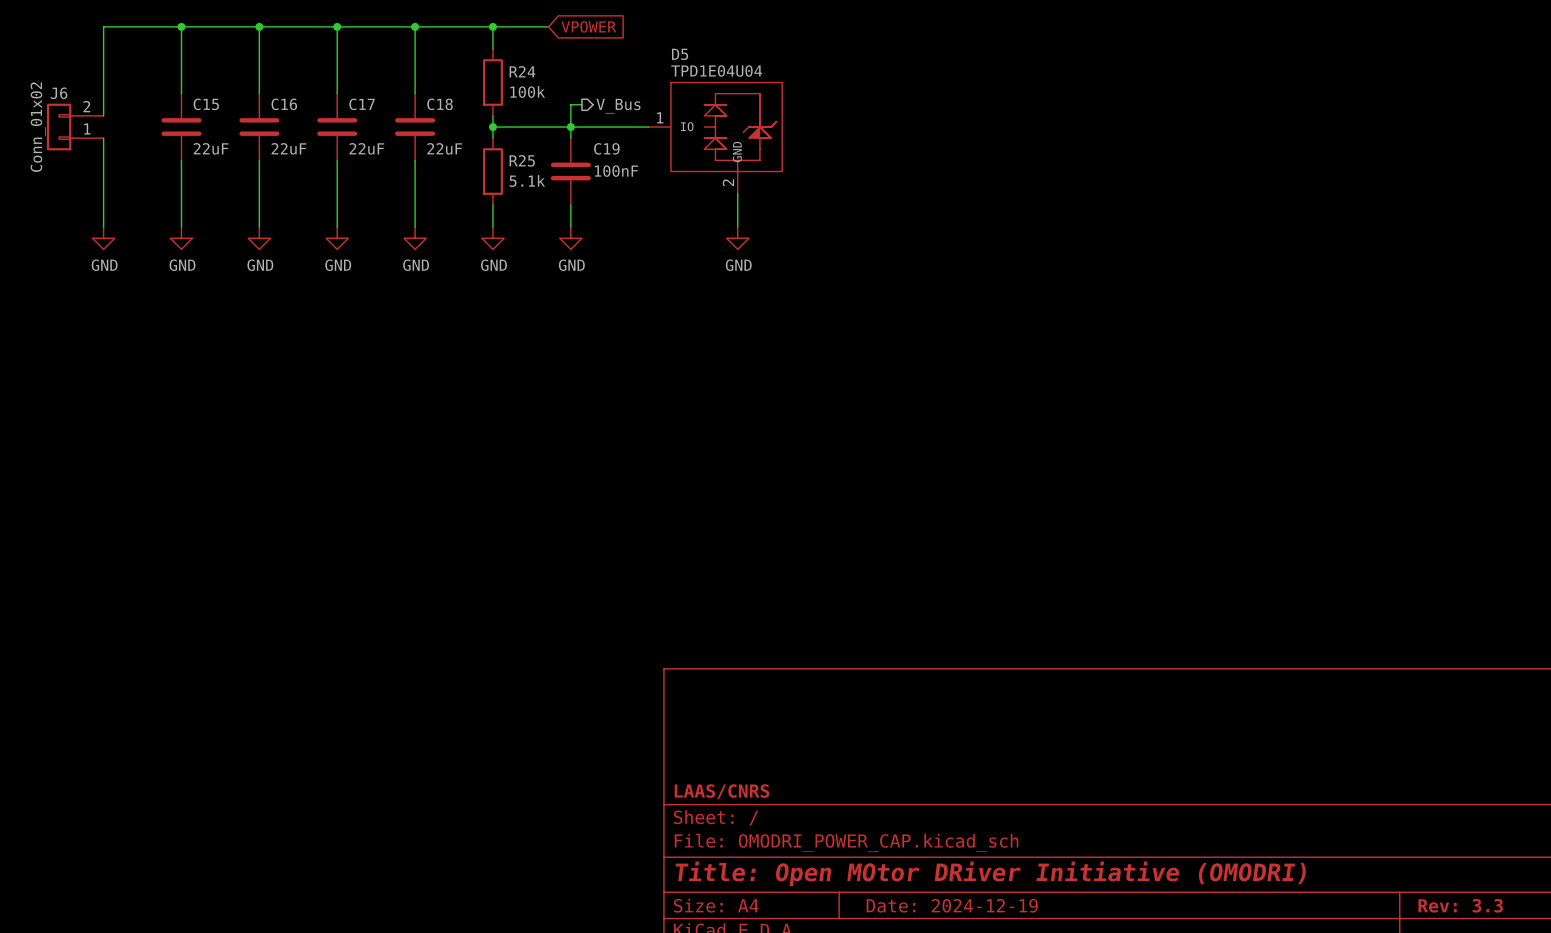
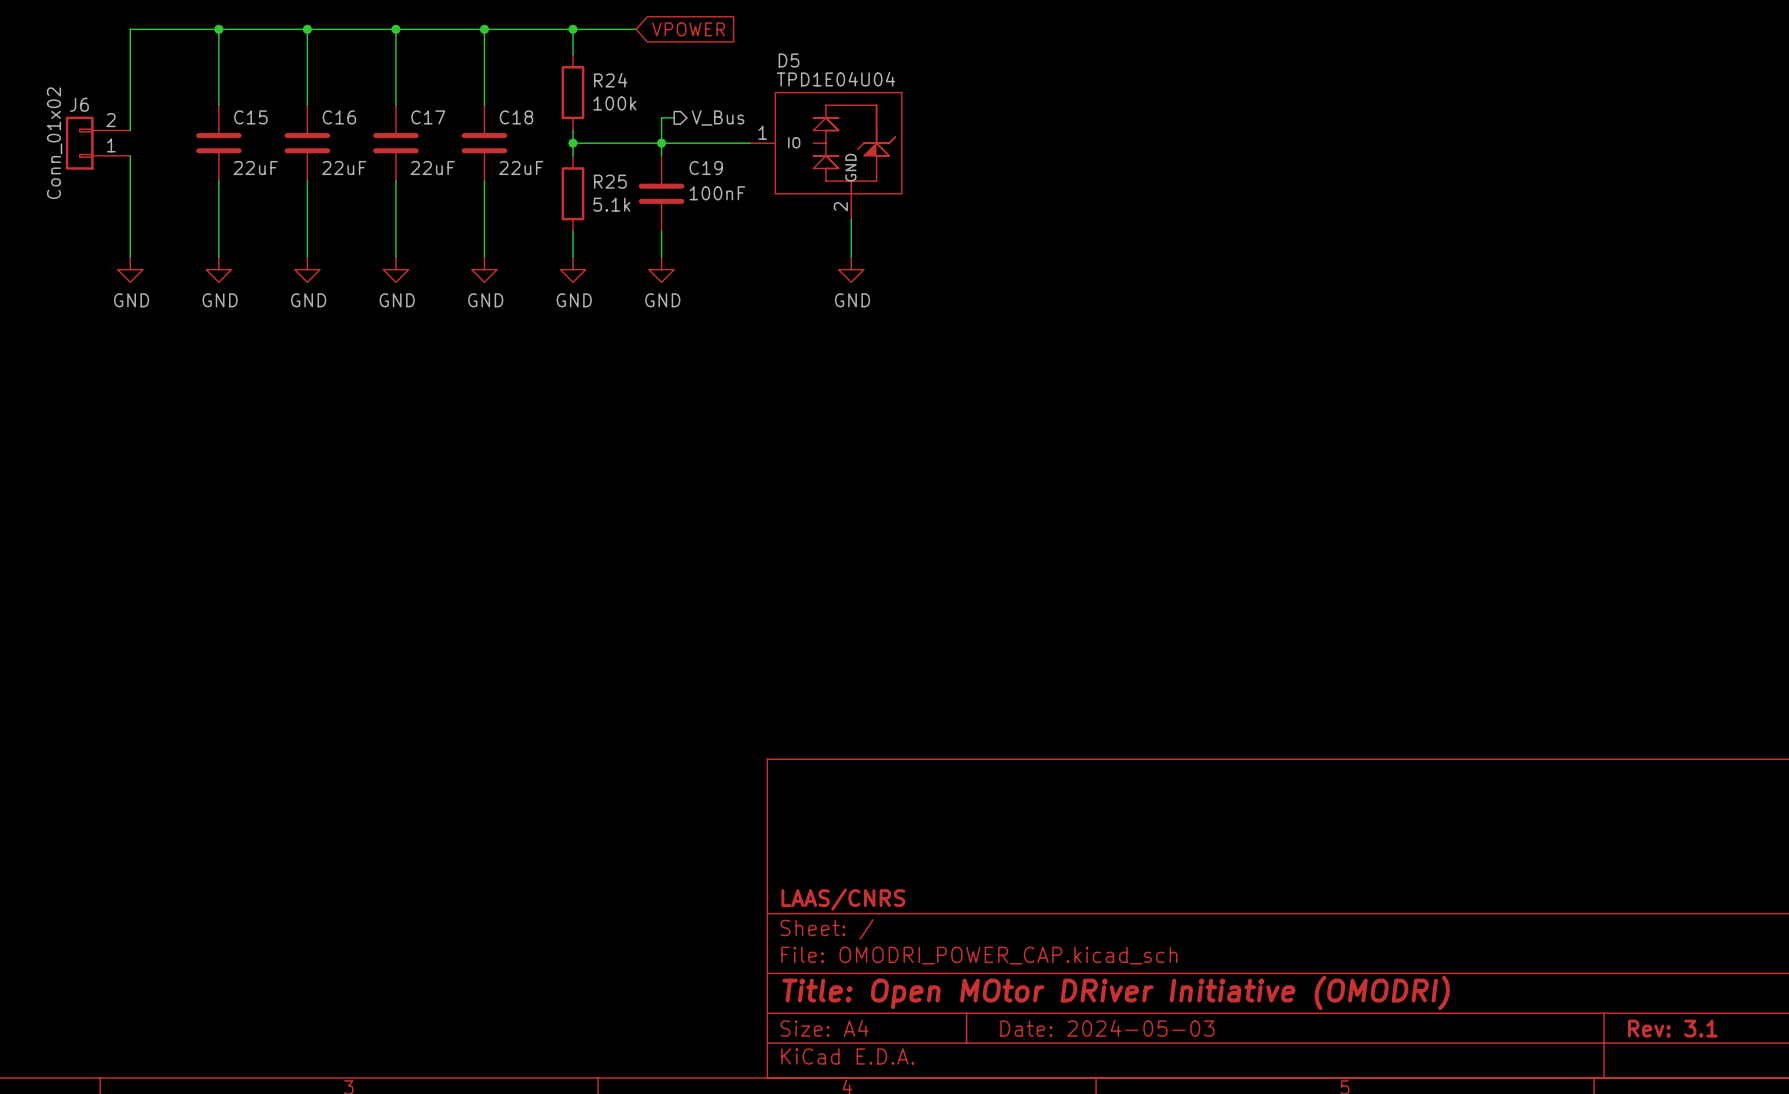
title block: Date: 2024-12-19 (952, 905) -> Date: 2024-05-03 (1107, 1028)
title block: Rev: 3.3 (1460, 905) -> Rev: 3.1 (1672, 1028)

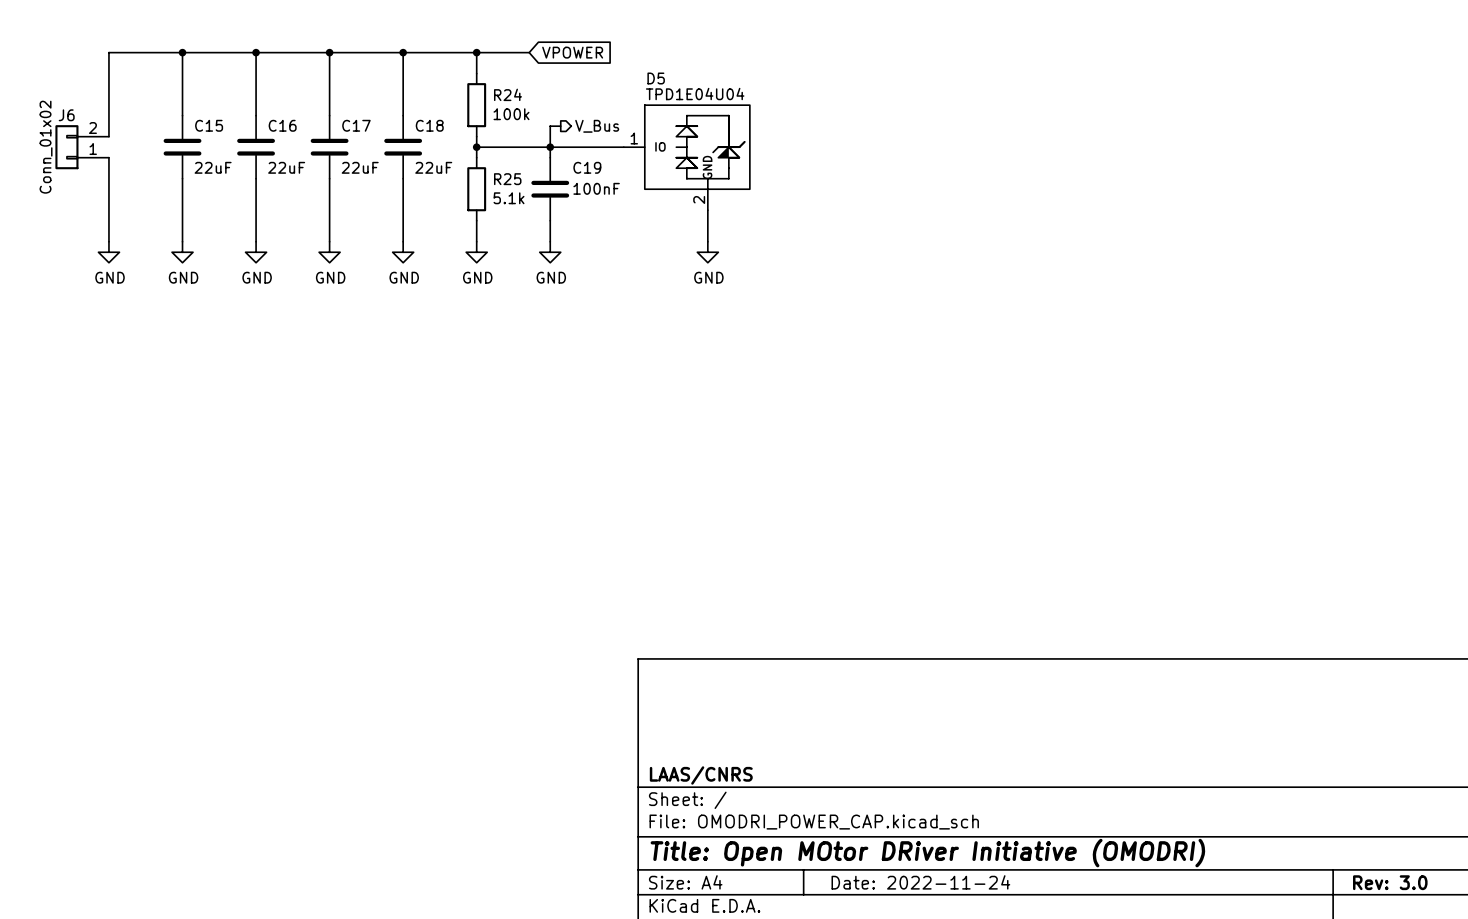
title block: Date: 2024-05-03 (1107, 1028) -> Date: 2022-11-24 (920, 882)
title block: Rev: 3.1 (1672, 1028) -> Rev: 3.0 (1390, 882)

